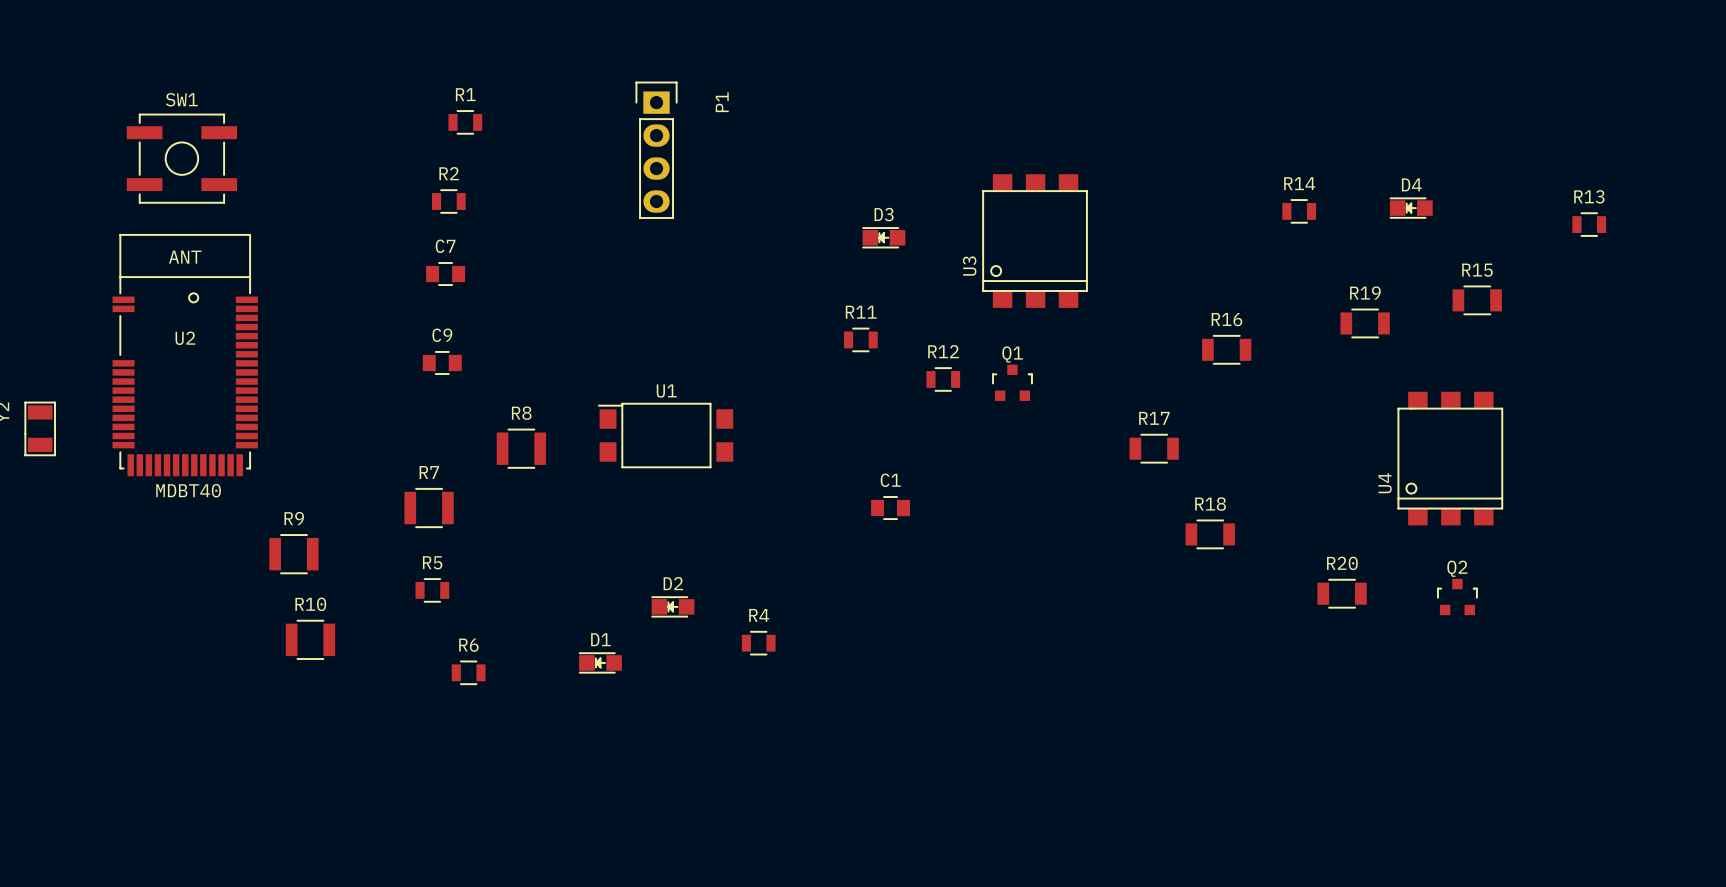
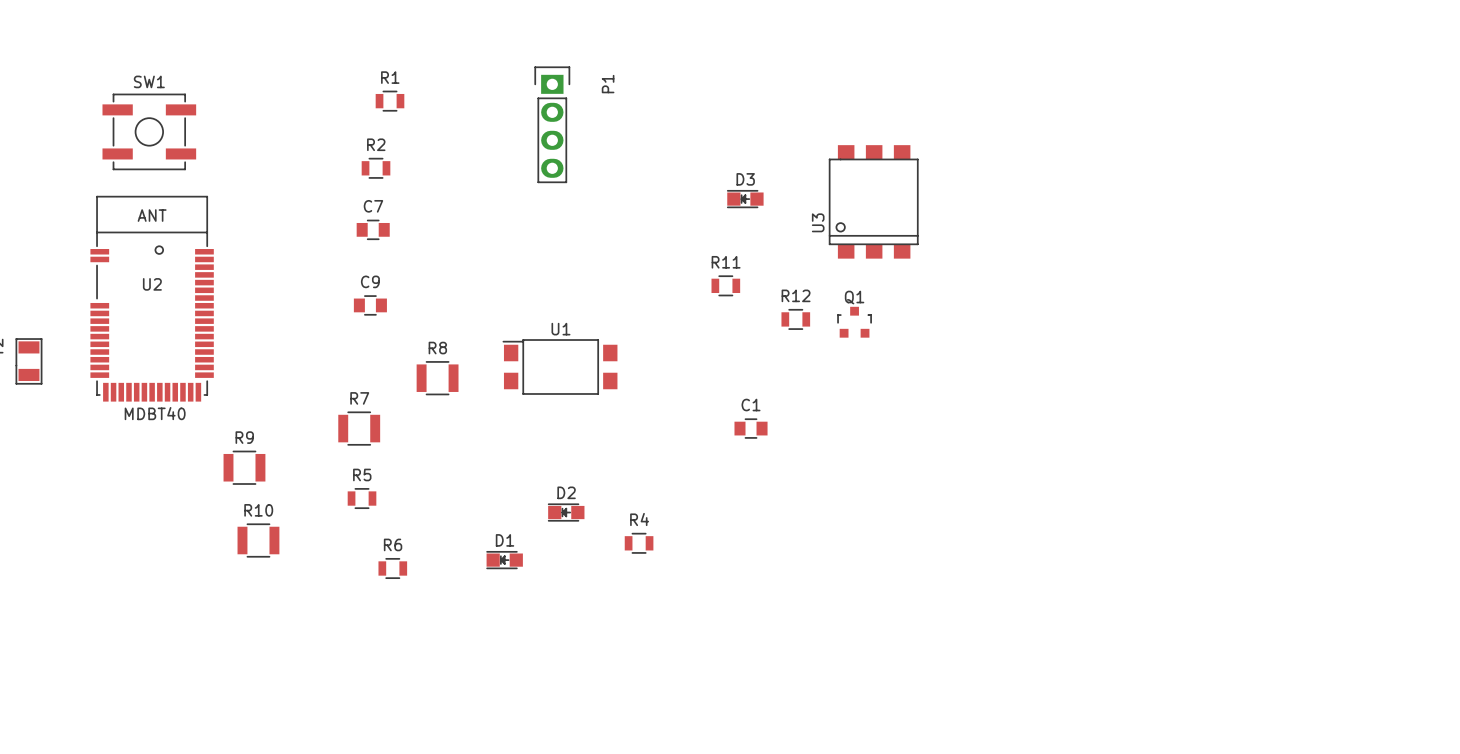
D4: (1411, 208) -> none
R14: (1299, 211) -> none
R13: (1589, 224) -> none
R15: (1477, 300) -> none
R19: (1365, 323) -> none
R16: (1226, 349) -> none
R17: (1154, 448) -> none
U4: (1450, 458) -> none
R18: (1210, 534) -> none
R20: (1342, 593) -> none
Q2: (1457, 597) -> none

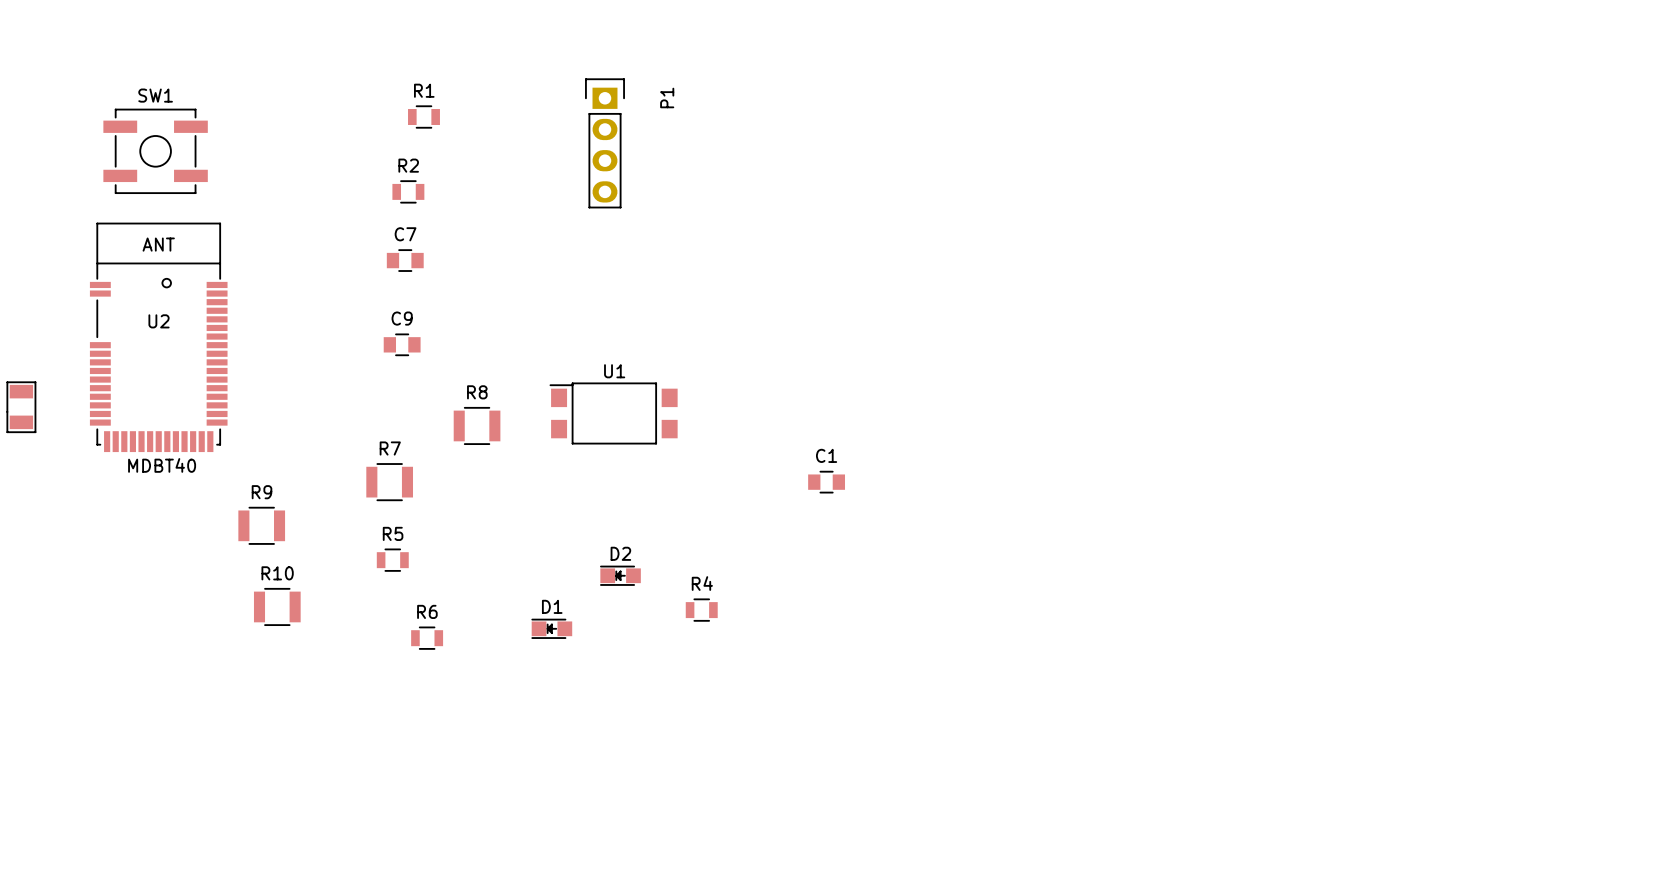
D3: (745, 199) -> none
U3: (873, 201) -> none
R11: (725, 285) -> none
R12: (795, 319) -> none
Q1: (854, 322) -> none

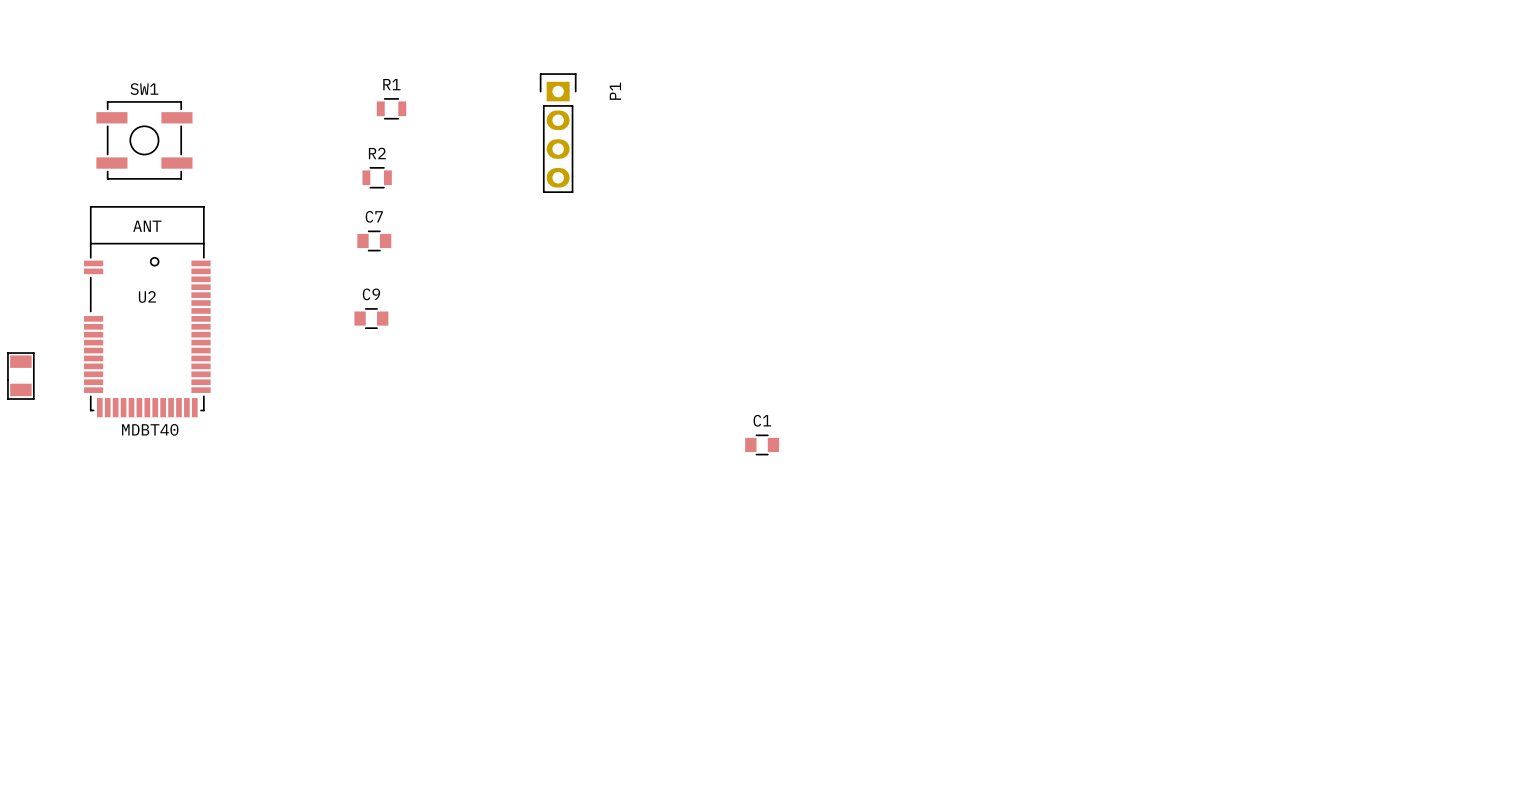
U1: (613, 413) -> none
R8: (477, 425) -> none
R7: (389, 482) -> none
R9: (261, 525) -> none
R5: (392, 560) -> none
D2: (620, 575) -> none
R10: (277, 606) -> none
R4: (701, 610) -> none
D1: (551, 628) -> none
R6: (427, 638) -> none

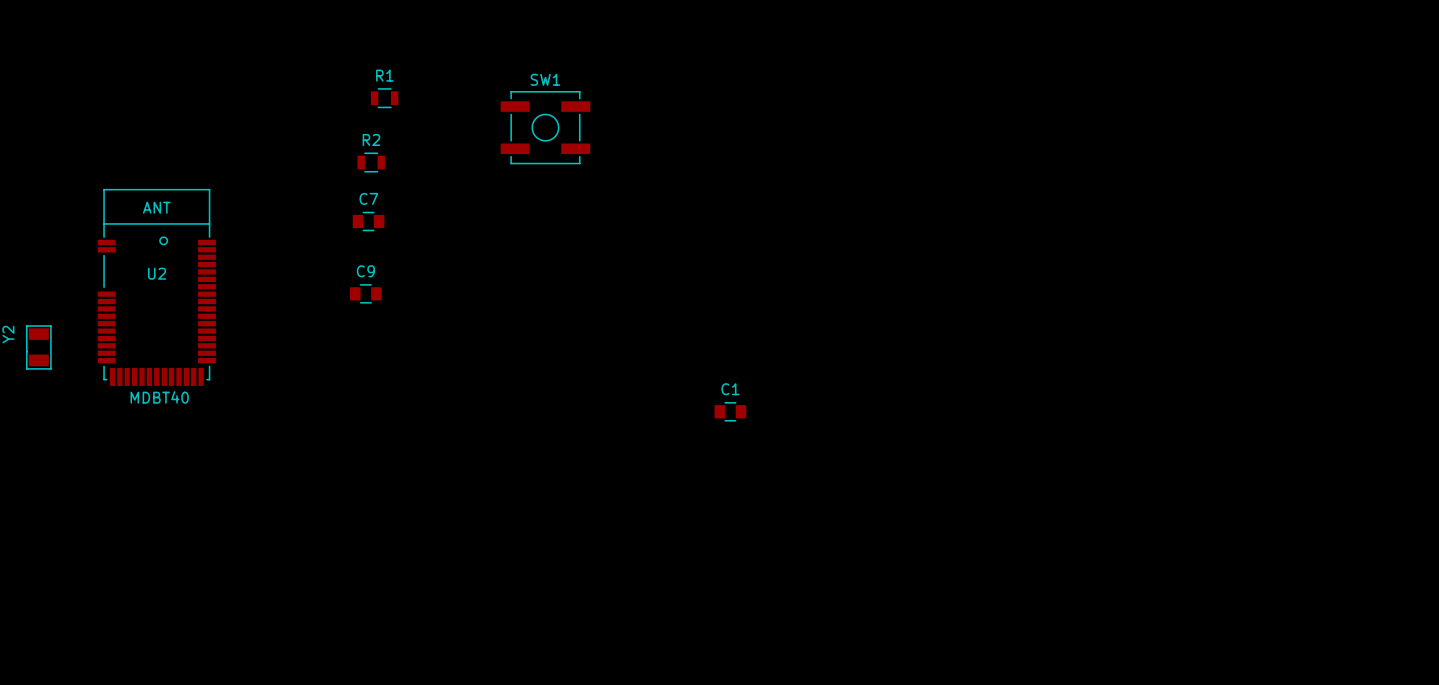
P1: (558, 133) -> none
SW1 position: (144, 140) -> (545, 127)

